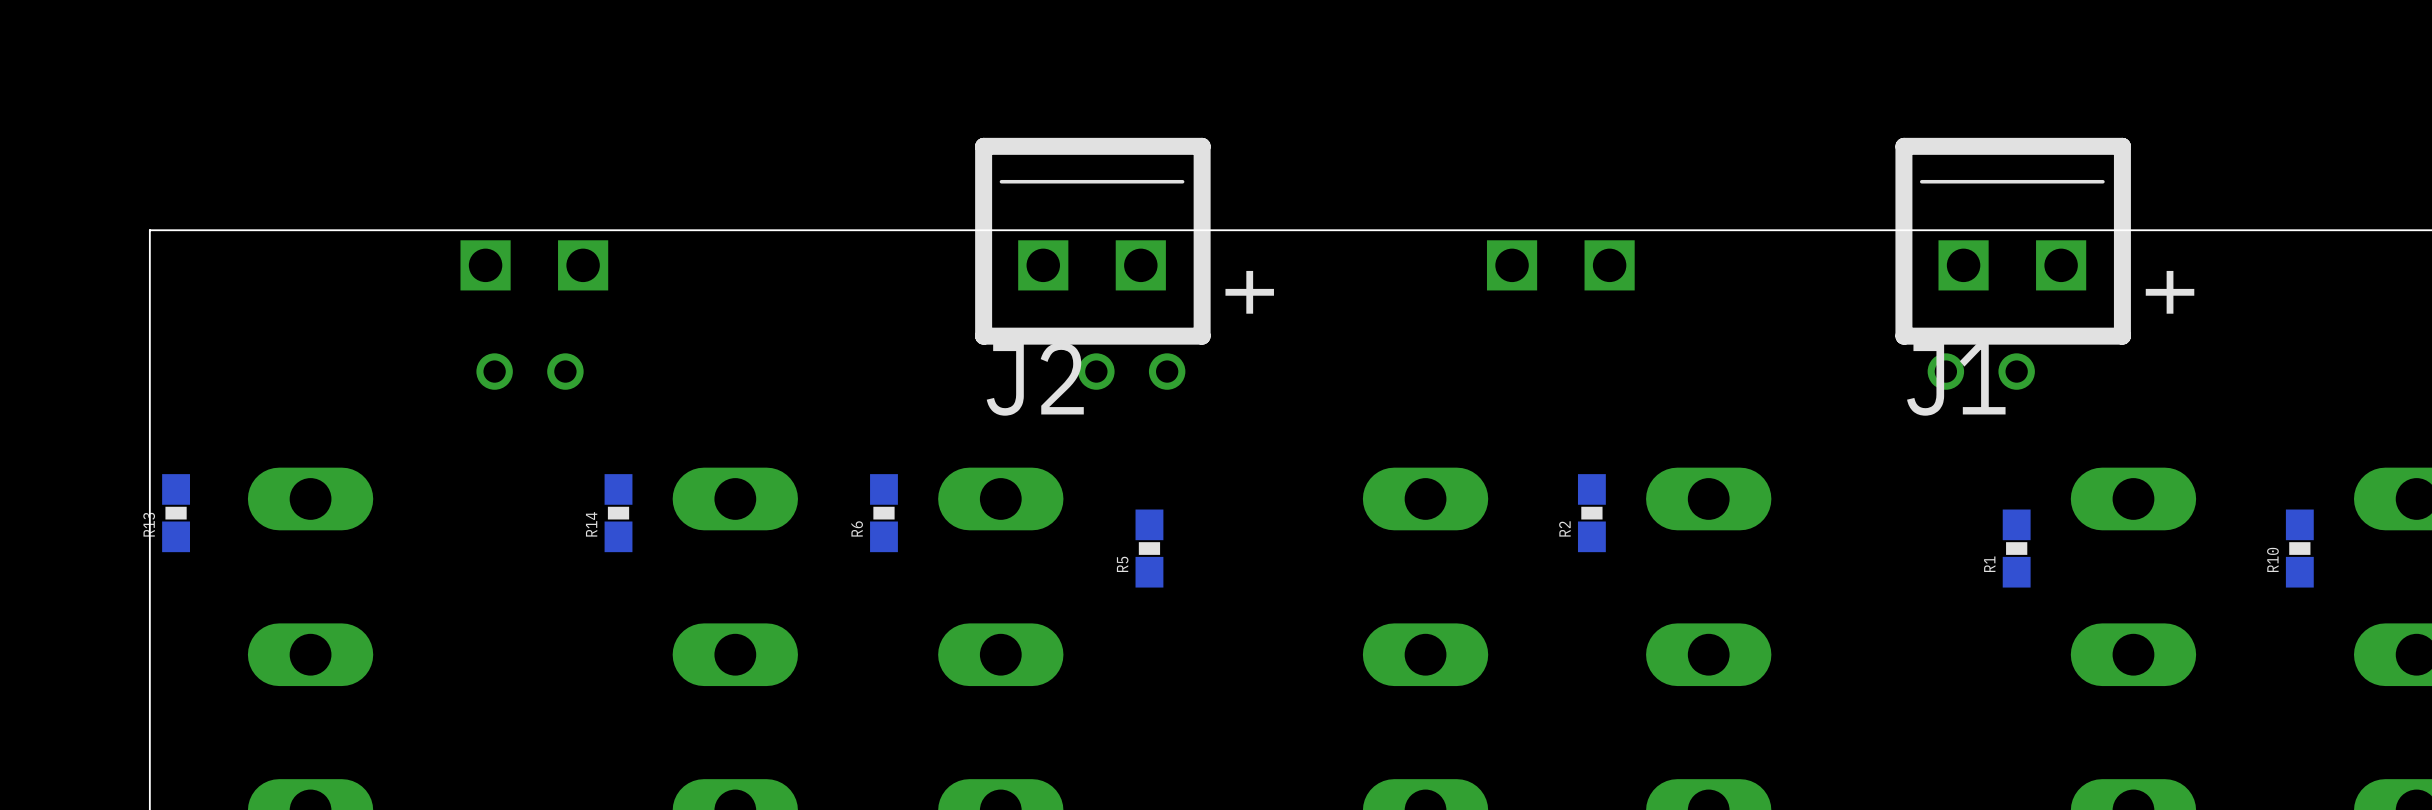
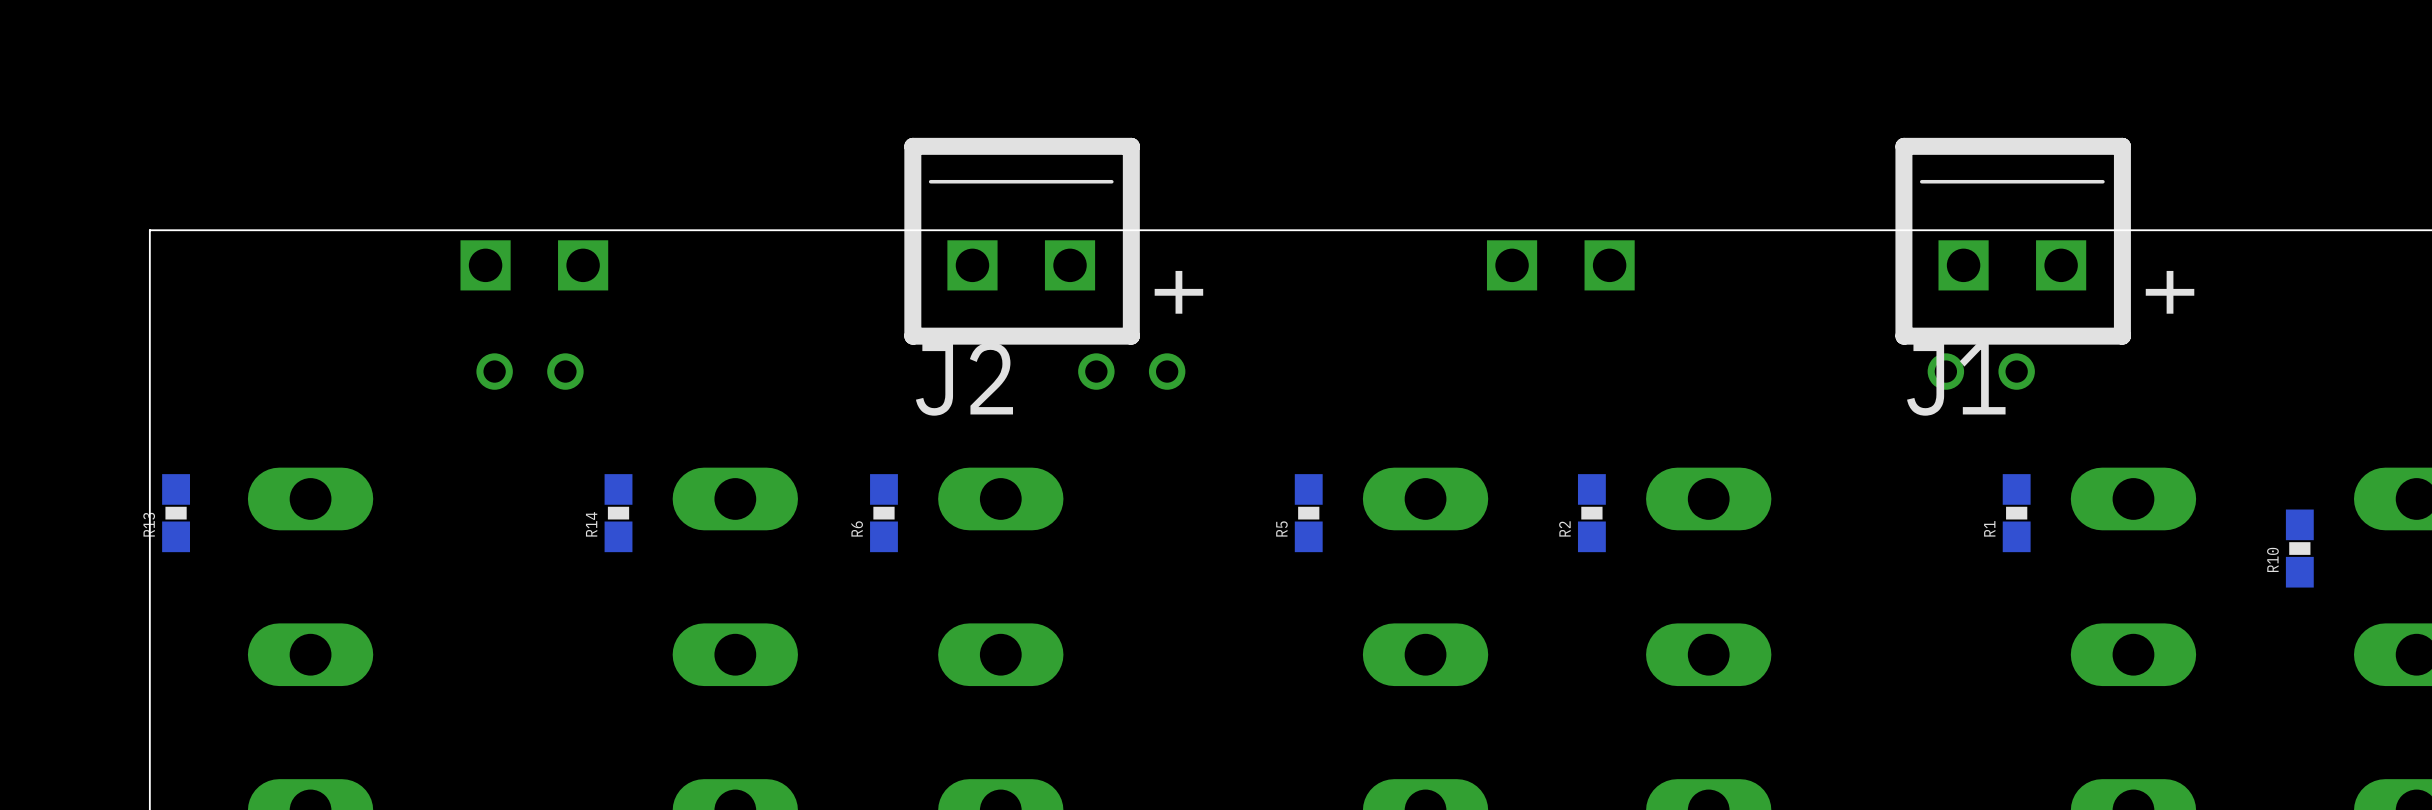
J2 position: (1092, 241) -> (1022, 241)
R5 position: (1149, 548) -> (1308, 513)
R1 position: (2016, 548) -> (2016, 513)

